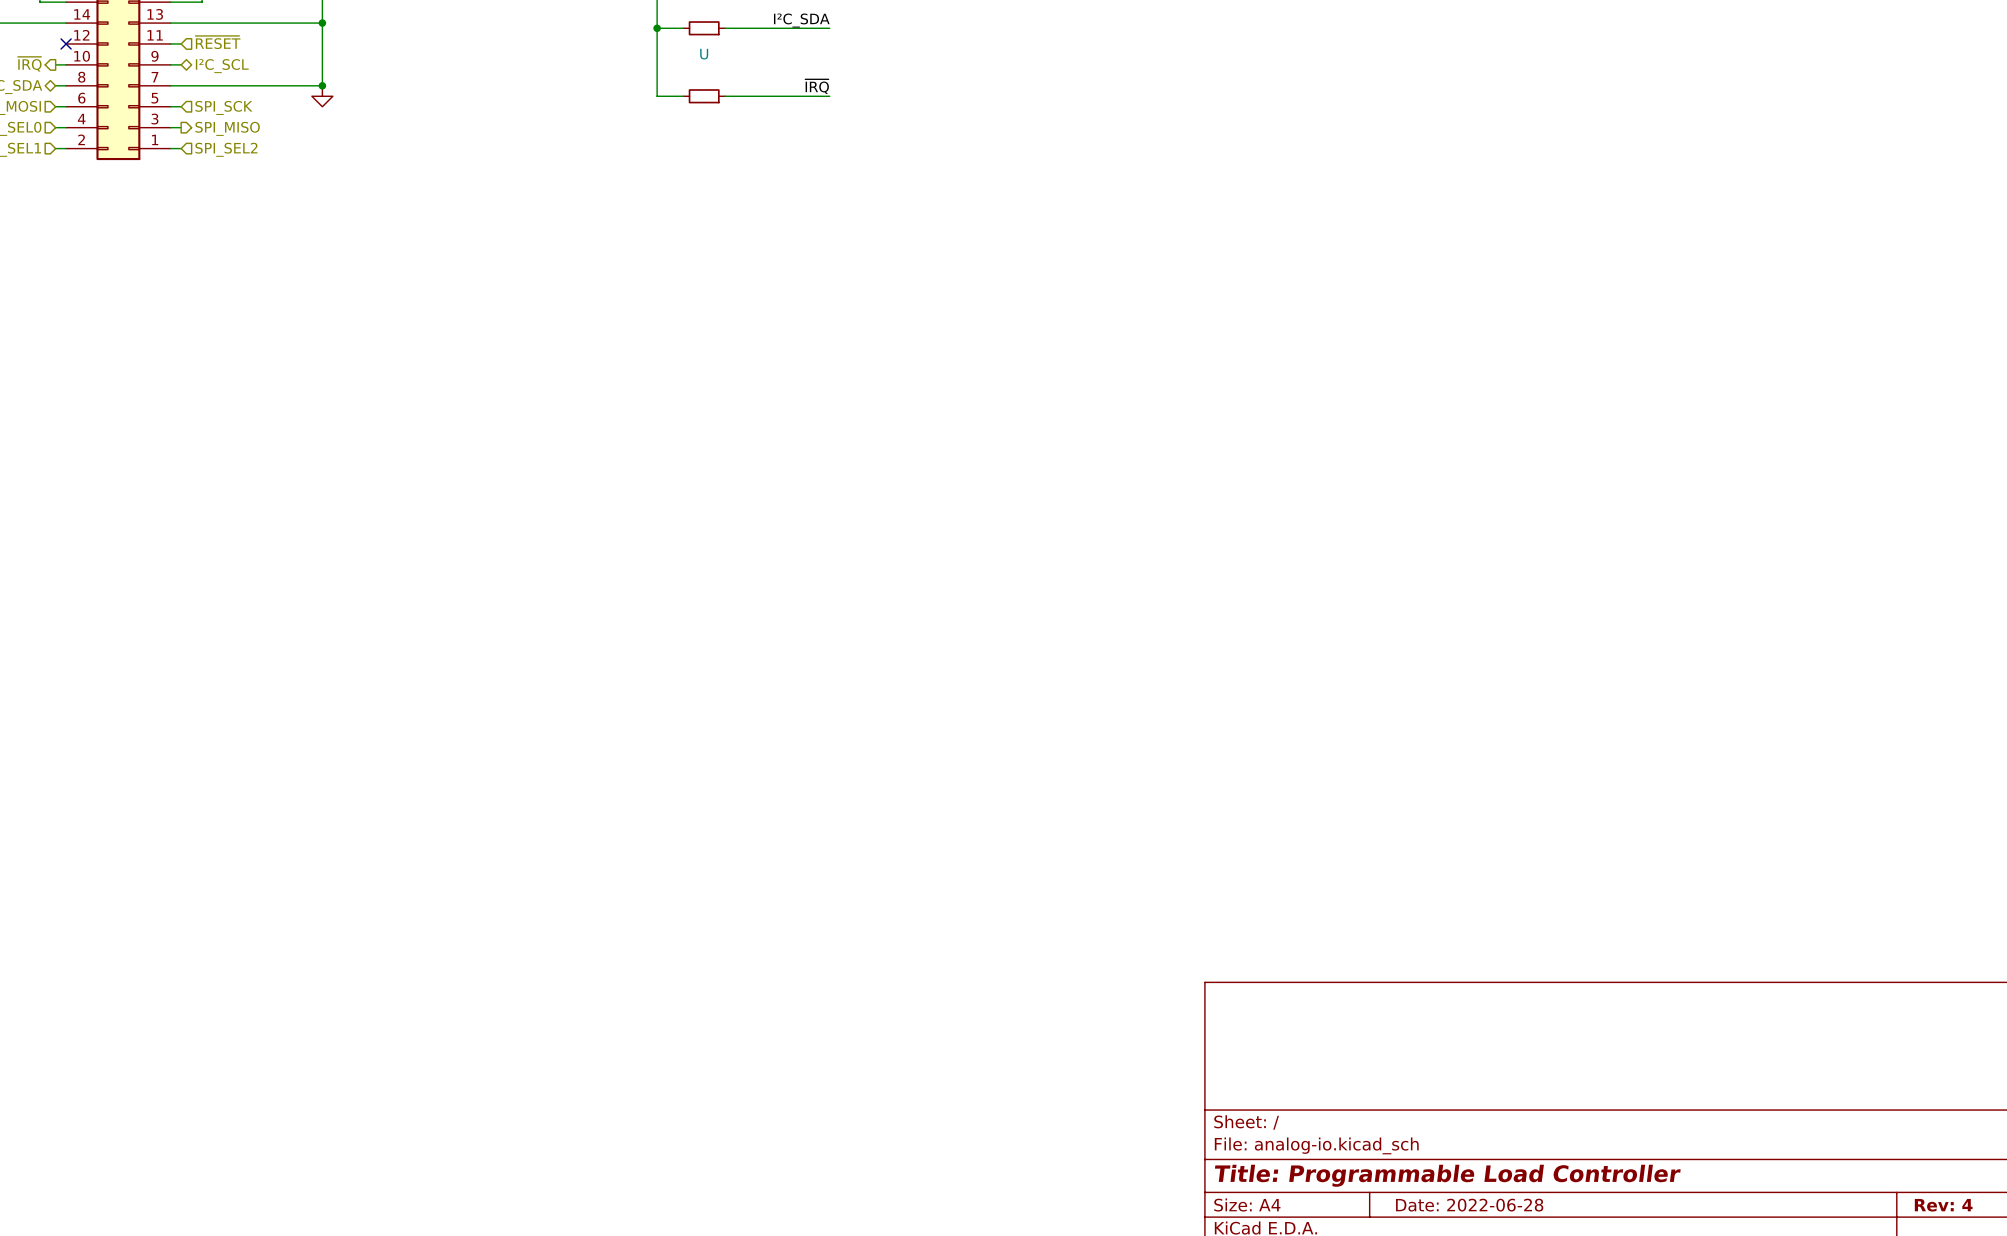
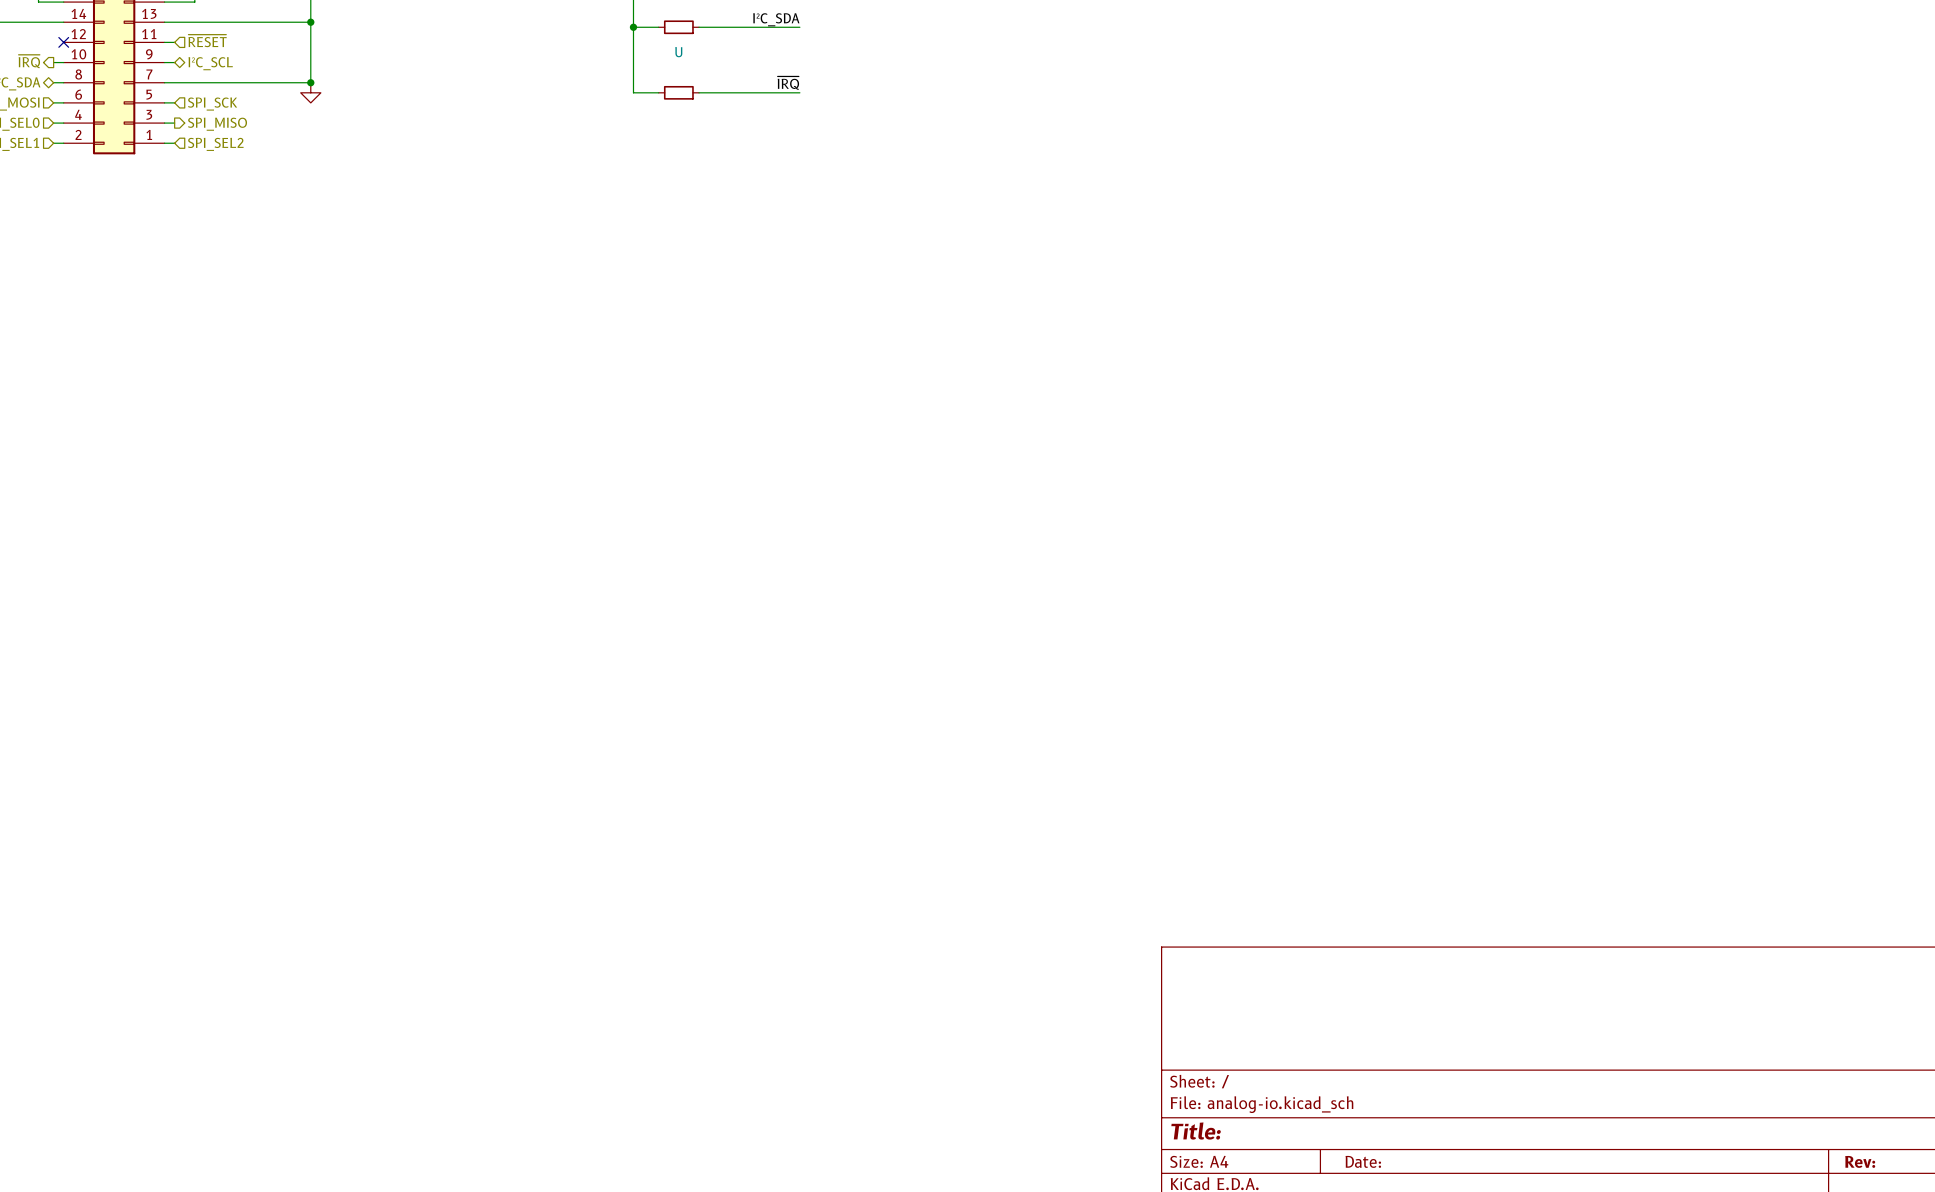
title block: Title: Programmable Load Controller (1447, 1175) -> Title: (1196, 1131)
title block: Date: 2022-06-28 (1469, 1205) -> Date: (1363, 1161)
title block: Rev: 4 (1943, 1205) -> Rev: (1860, 1161)

